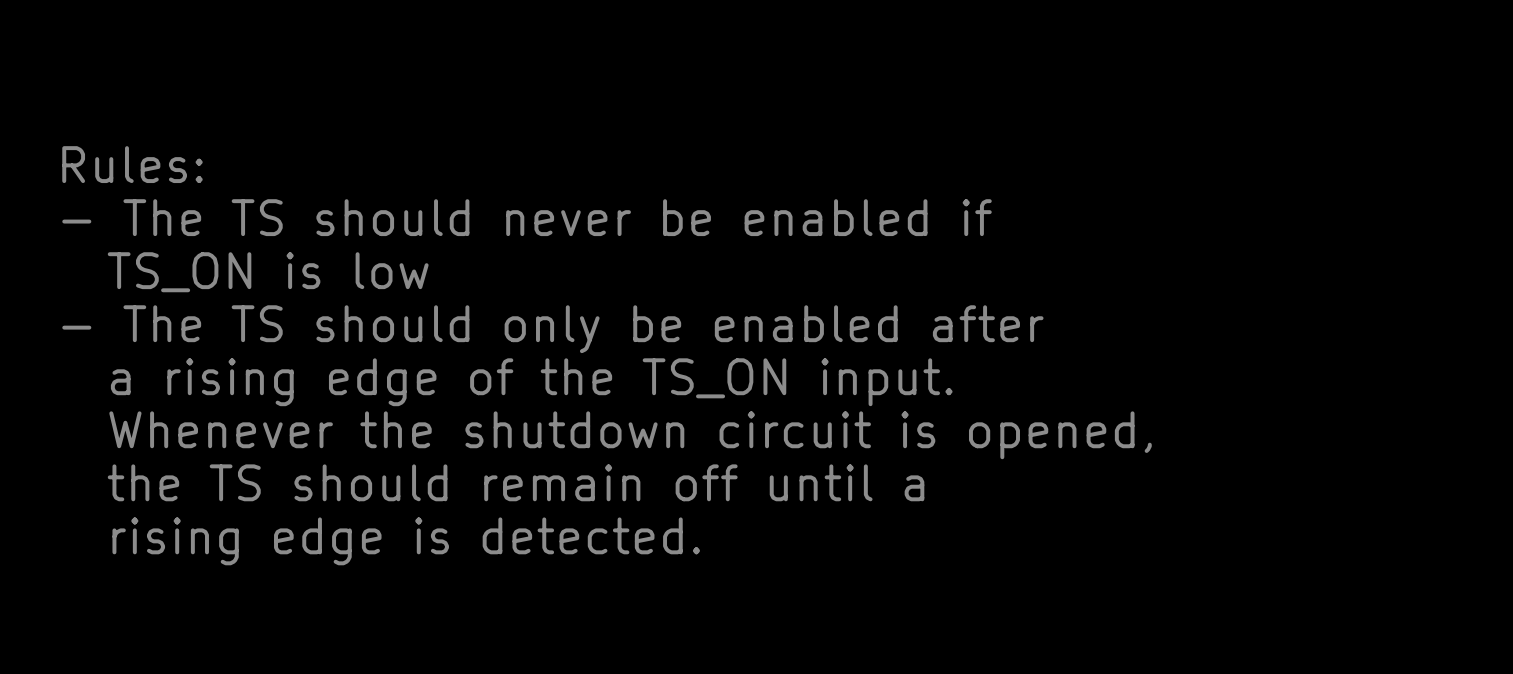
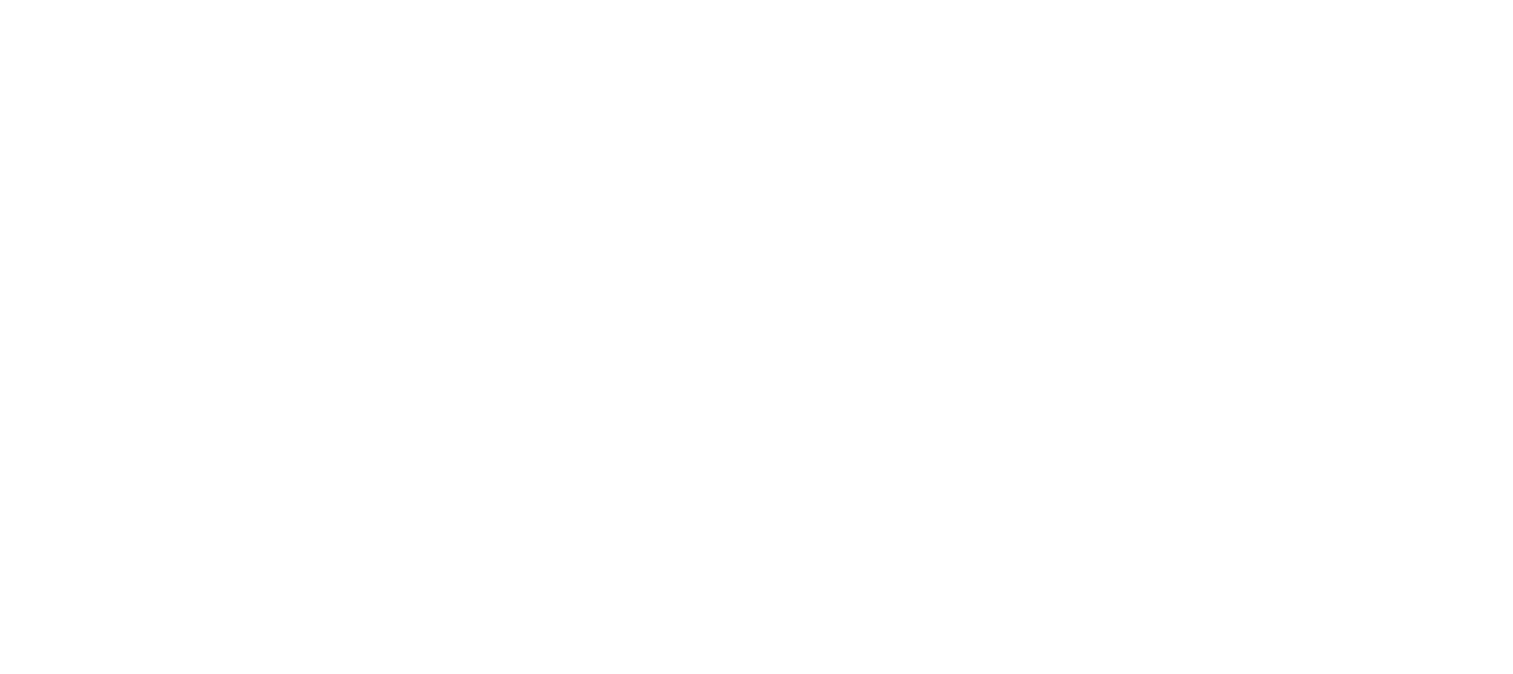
text: Rules: (132, 164) -> none
text: - The TS should never be enabled if (527, 217) -> none
text: TS_ON is low (268, 272) -> none
text: - The TS should only be enabled after (552, 329) -> none
text: a rising edge of the TS_ON input. (531, 382) -> none
text: Whenever the shutdown circuit is opened, (630, 435) -> none
text: the TS should remain off until a (516, 482) -> none
text: rising edge is detected. (406, 541) -> none

